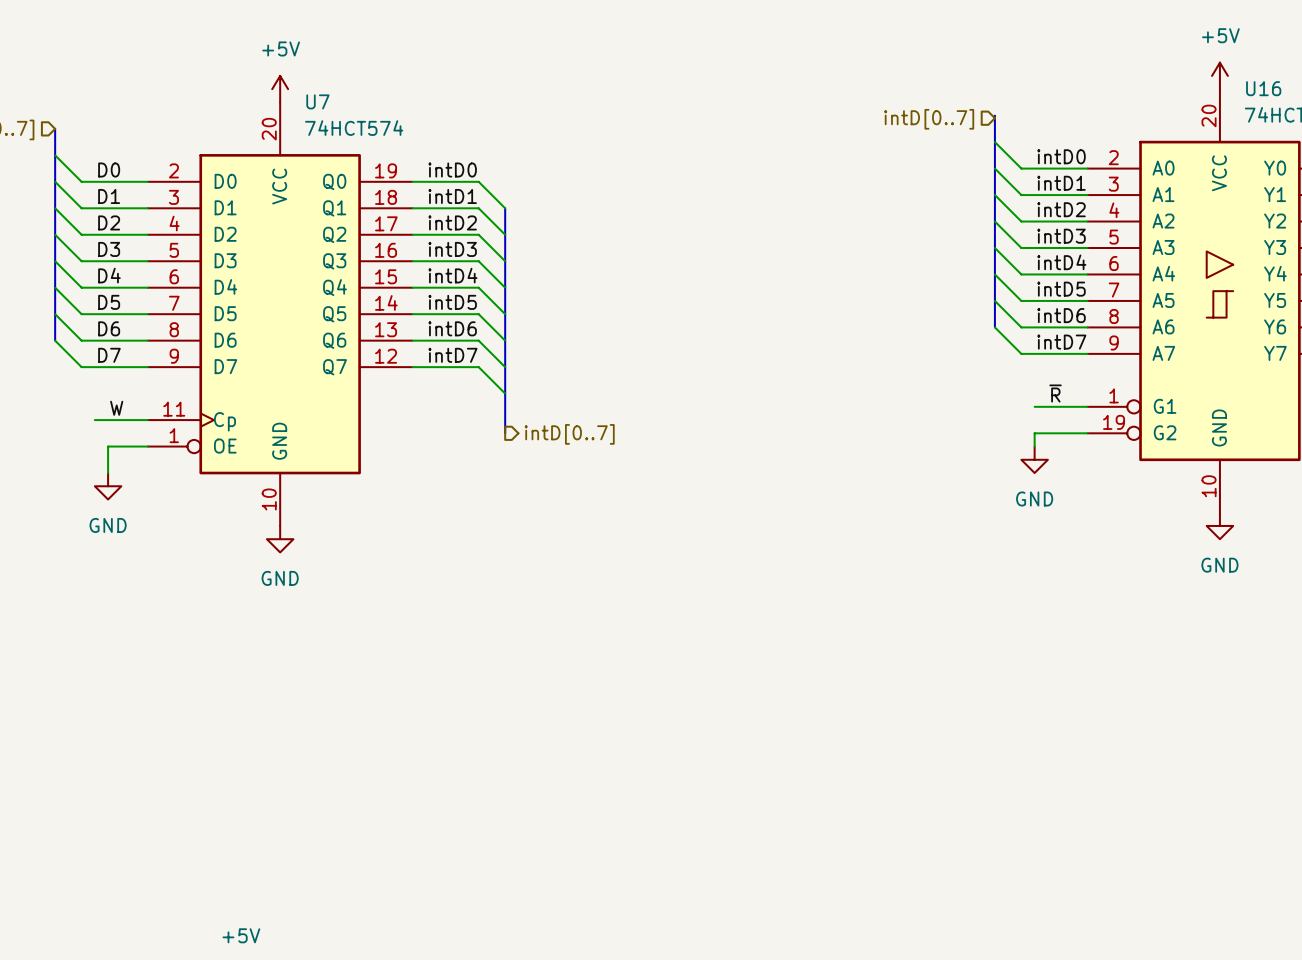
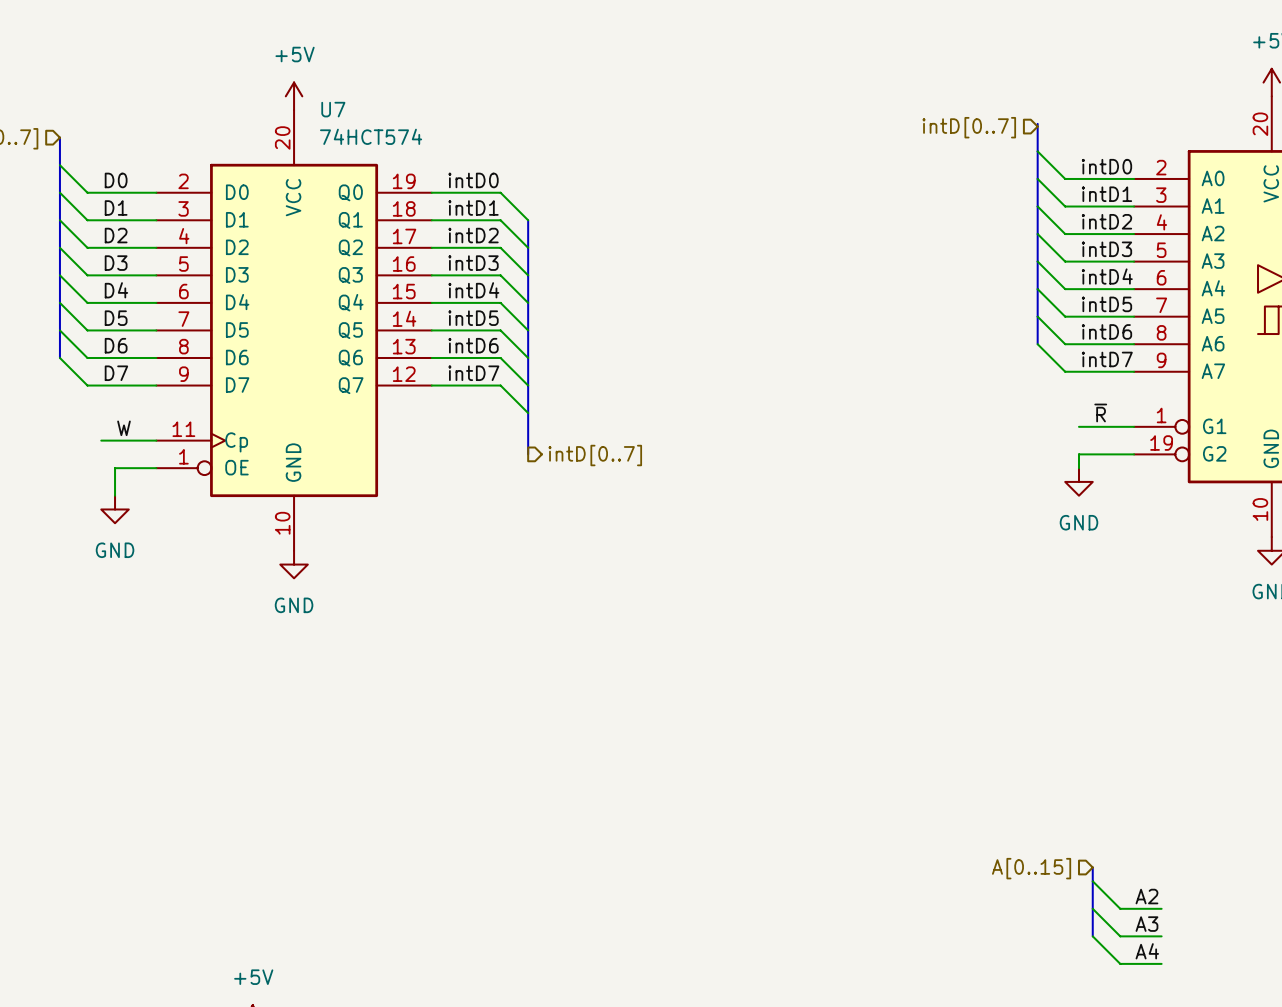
bus: none -> (1092, 867) (1092, 936)
hierarchical label: none -> A[0..15] (1031, 868)
wire: none -> (1092, 881) (1120, 908) (1161, 908)
label: none -> A2 (1146, 896)
wire: none -> (1092, 908) (1120, 936) (1161, 936)
label: none -> A3 (1146, 924)
wire: none -> (1092, 936) (1120, 963) (1161, 963)
label: none -> A4 (1147, 951)

